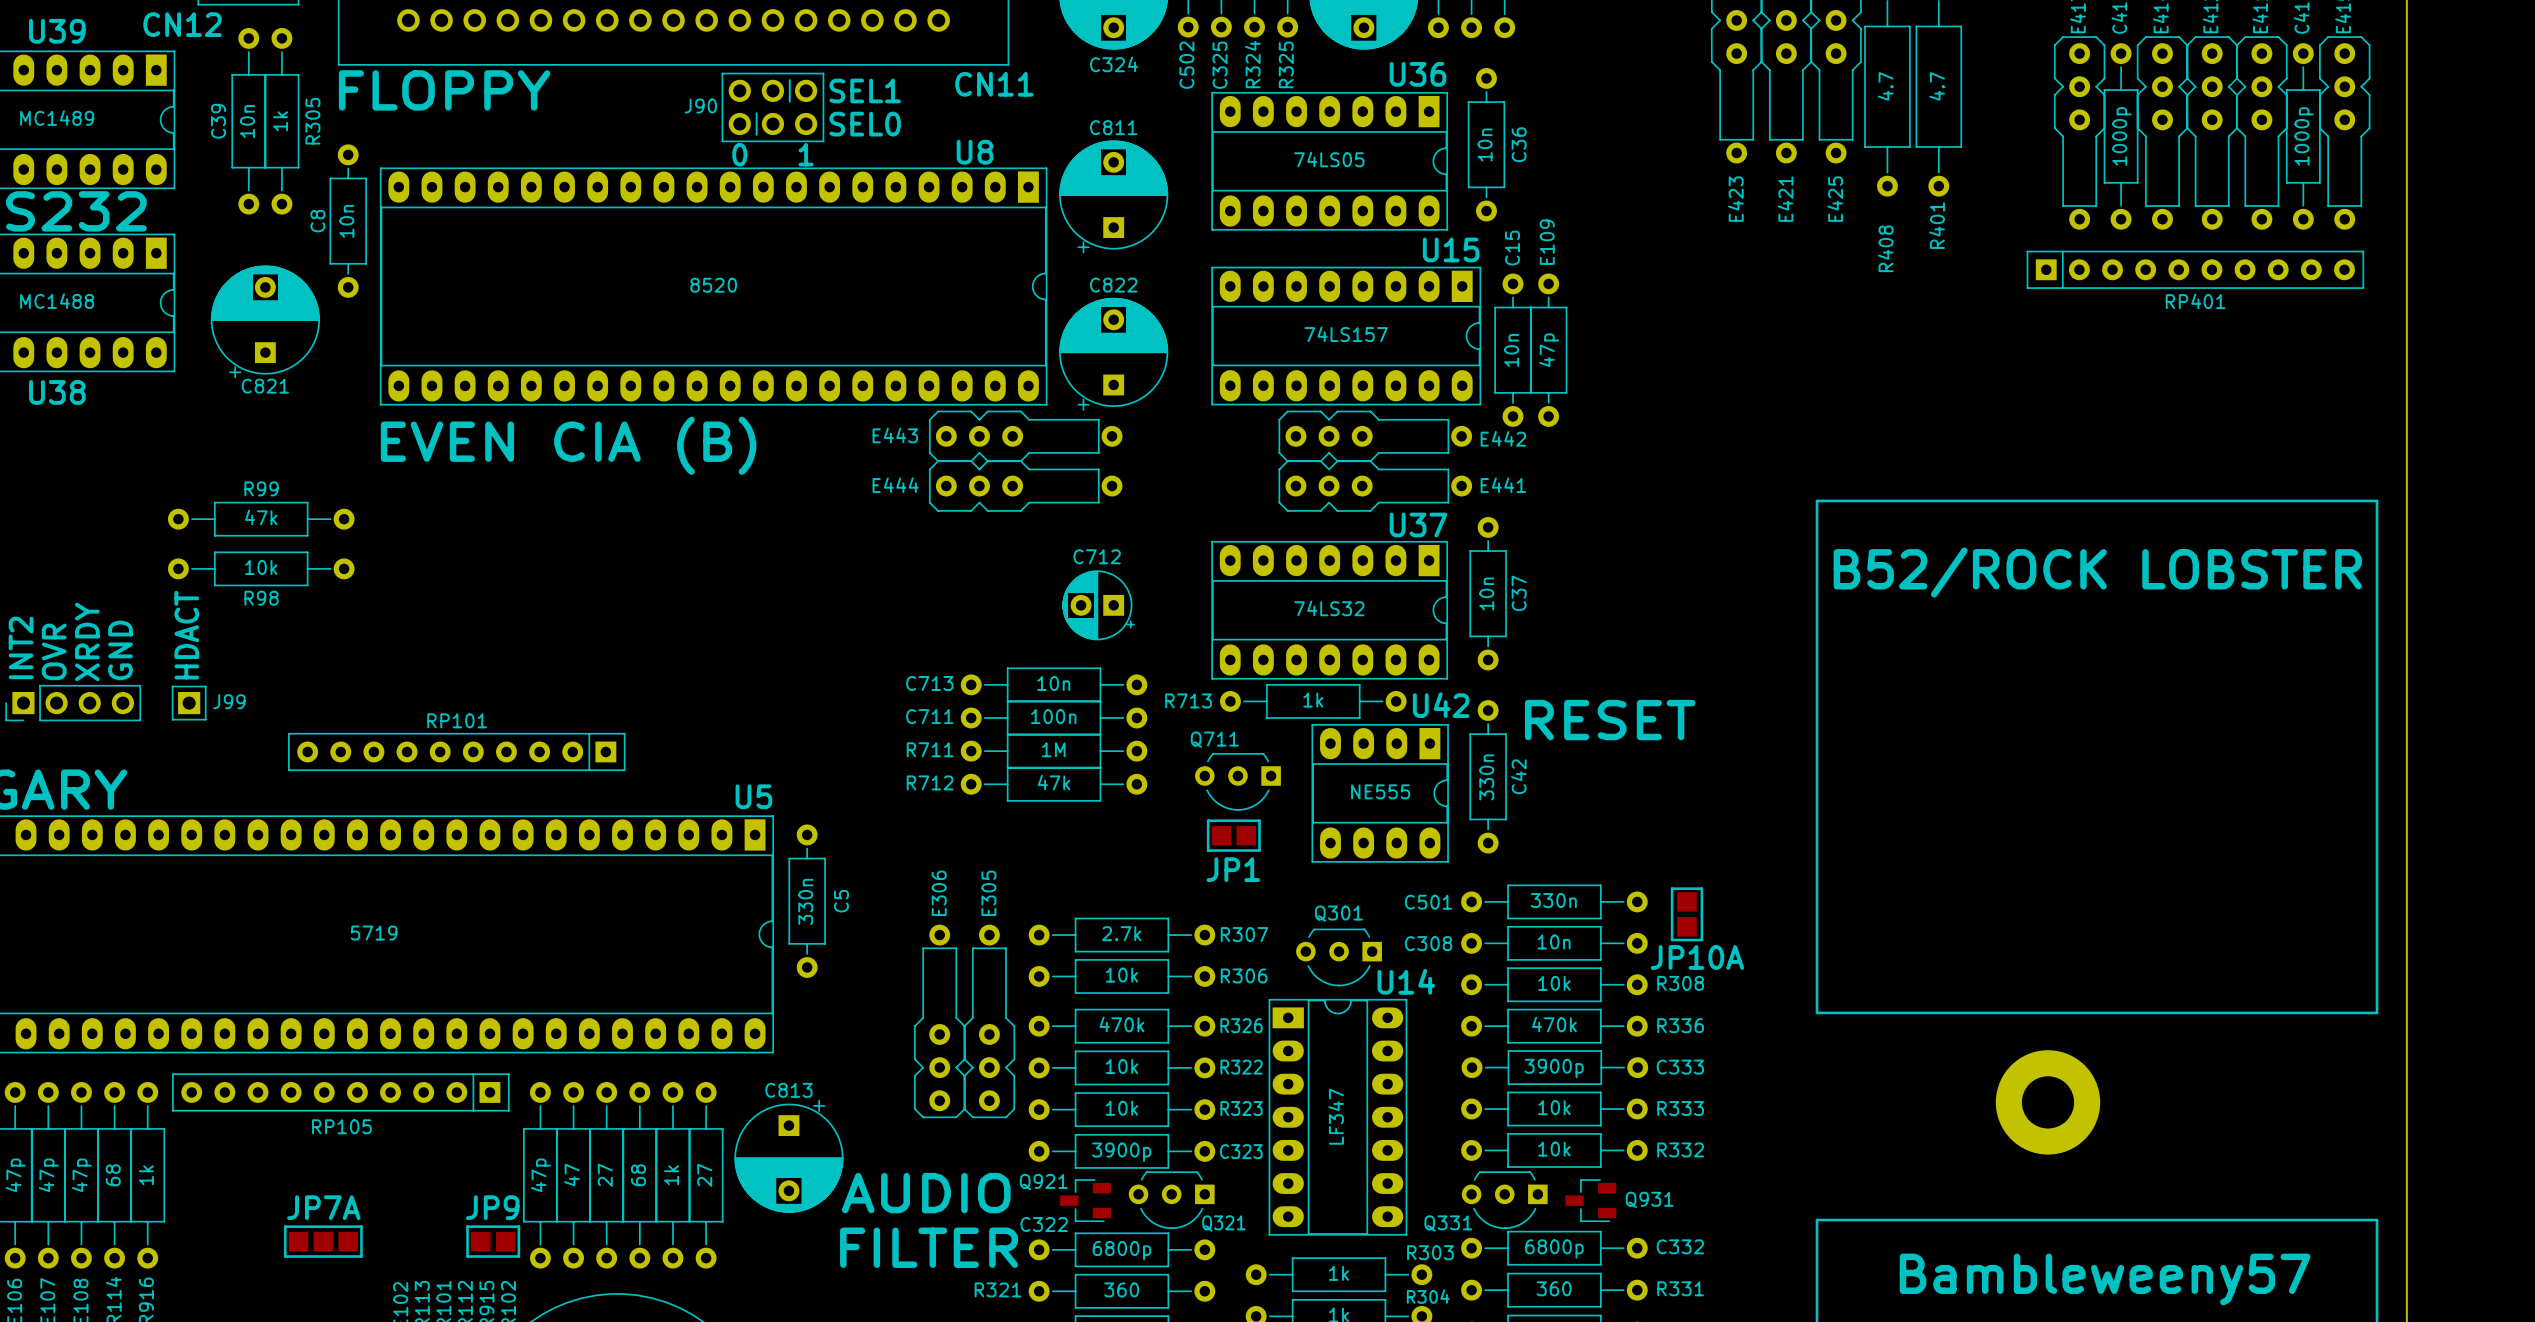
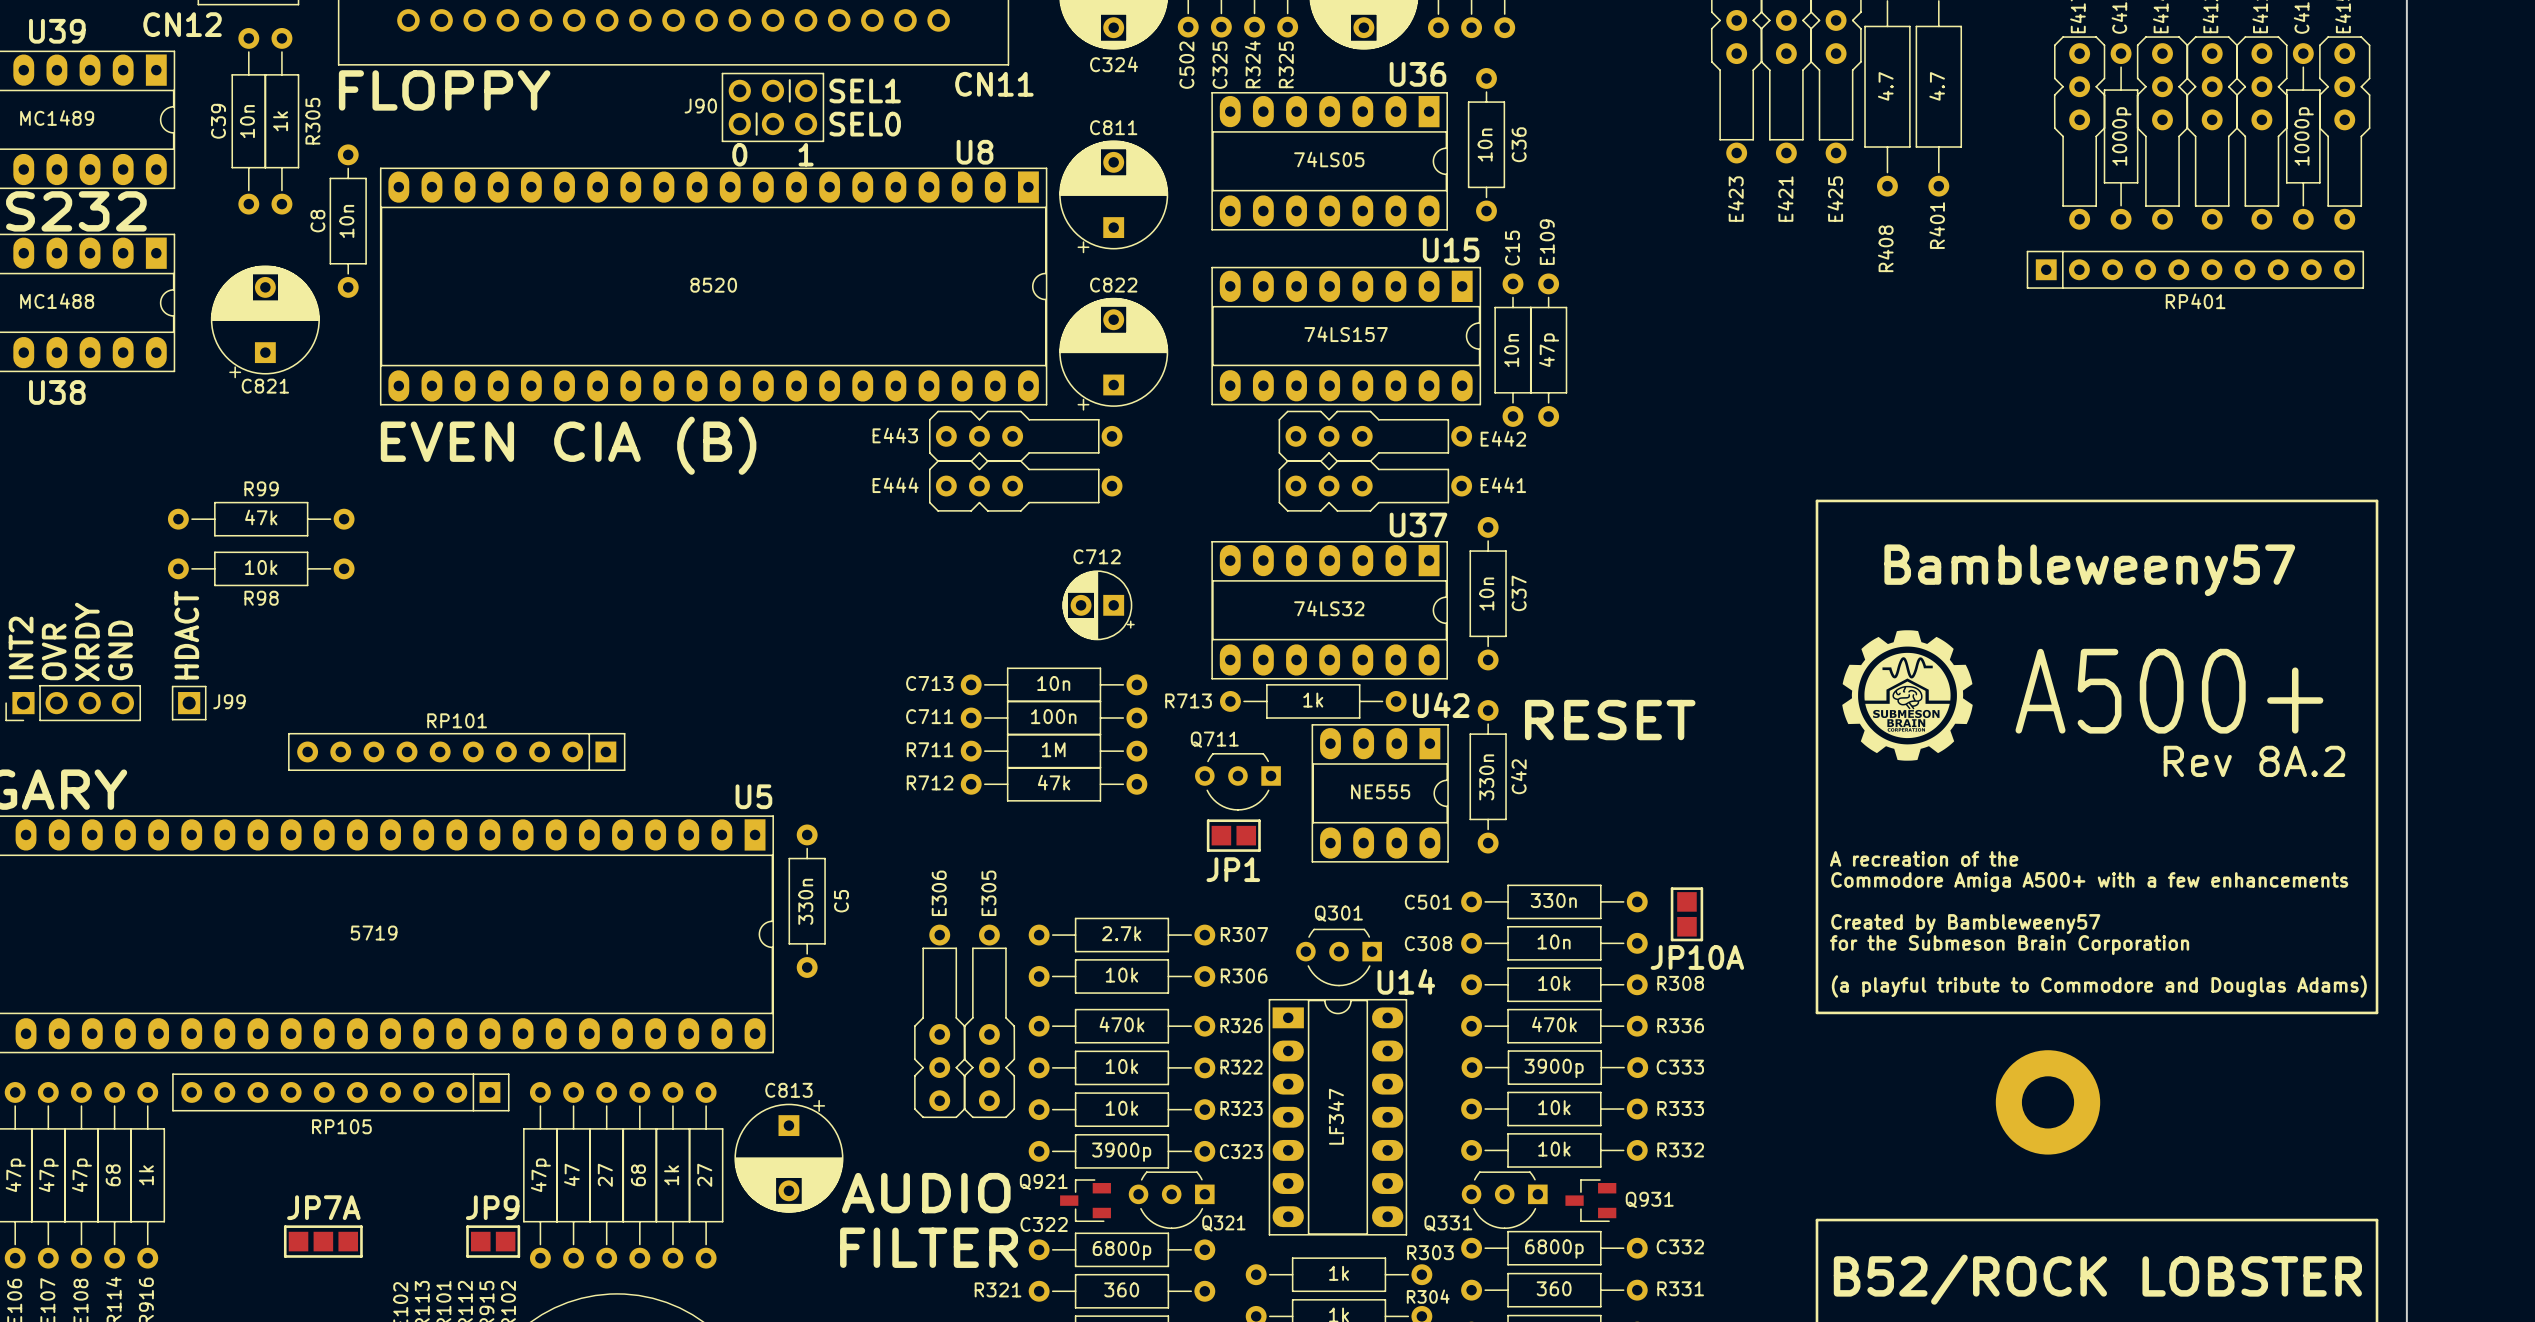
text: B52/ROCK LOBSTER (2097, 572) -> Bambleweeny57 (2089, 570)
drawing: none -> [1842, 630, 1973, 761]
text: none -> A500+ (2169, 691)
text: none -> Rev 8A.2 (2254, 761)
text: none -> A recreation of the (1924, 858)
text: none -> Commodore Amiga A500+ with a few enhancements (2089, 882)
text: none -> Created by Bambleweeny57 (1965, 924)
text: none -> for the Submeson Brain Corporation (2009, 945)
text: none -> (a playful tribute to Commodore and Douglas Adams) (2099, 986)
text: Bambleweeny57 (2105, 1279) -> B52/ROCK LOBSTER (2097, 1279)

